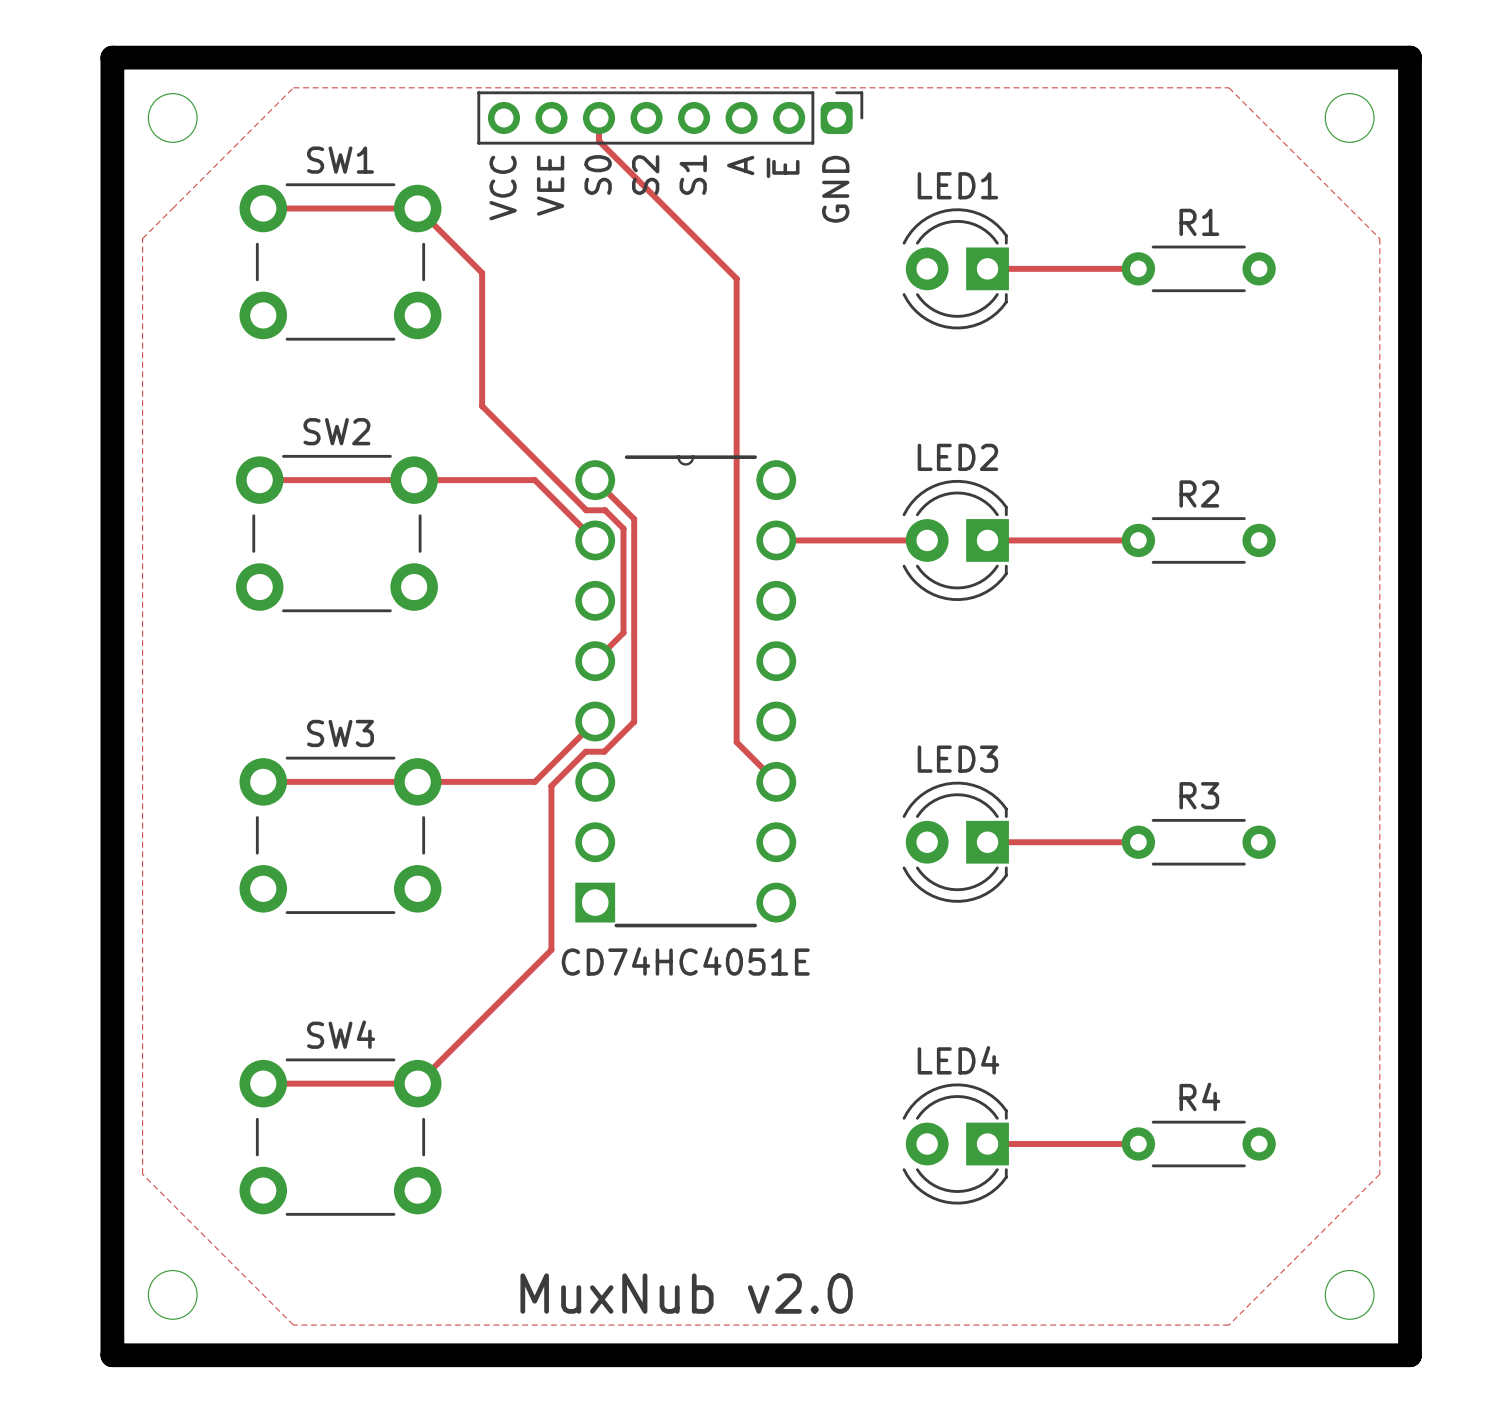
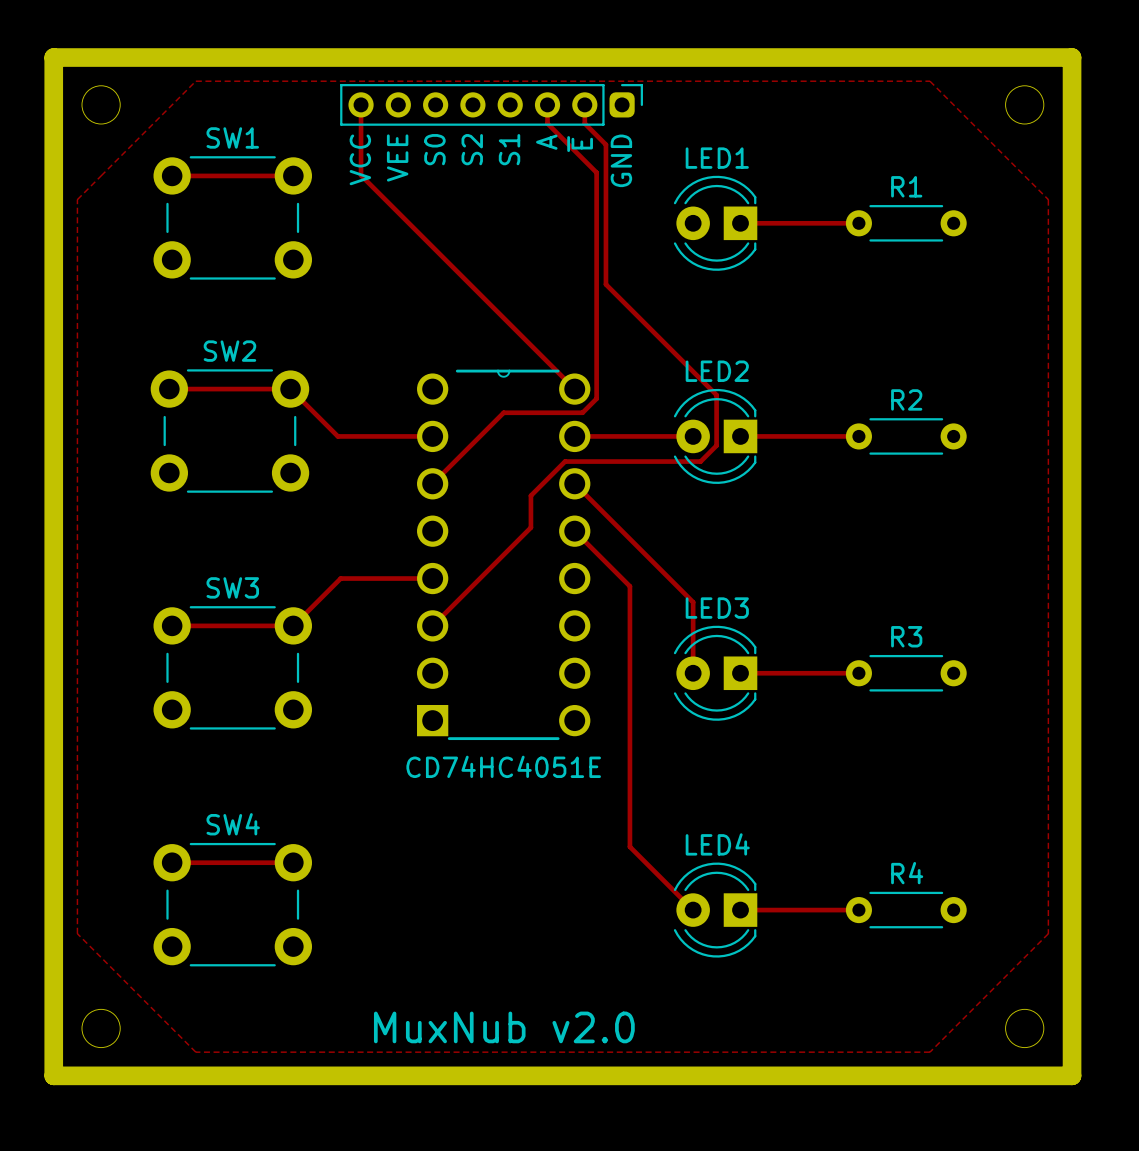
track: none -> (361, 104) (361, 175) (574, 389)
track: (599, 117) (599, 141) (736, 278) (736, 742) (776, 781) -> none
track: none -> (547, 104) (547, 123) (596, 172) (596, 398) (582, 412) (503, 412) (432, 483)
track: none -> (584, 104) (584, 123) (605, 144) (605, 284) (716, 395) (716, 445) (700, 461) (565, 461) (530, 495) (530, 527) (432, 625)
track: (417, 208) (482, 272) (482, 406) (586, 510) (605, 510) (623, 528) (623, 632) (595, 661) -> none
track: (414, 480) (534, 480) (595, 540) -> (290, 389) (337, 436) (432, 436)
track: (595, 480) (634, 519) (634, 721) (604, 751) (585, 751) (551, 786) (551, 949) (417, 1083) -> none
track: none -> (574, 483) (693, 602) (693, 673)
track: none -> (574, 531) (629, 586) (629, 846) (693, 910)
track: (595, 721) (534, 781) (417, 781) -> (432, 578) (340, 578) (293, 625)

